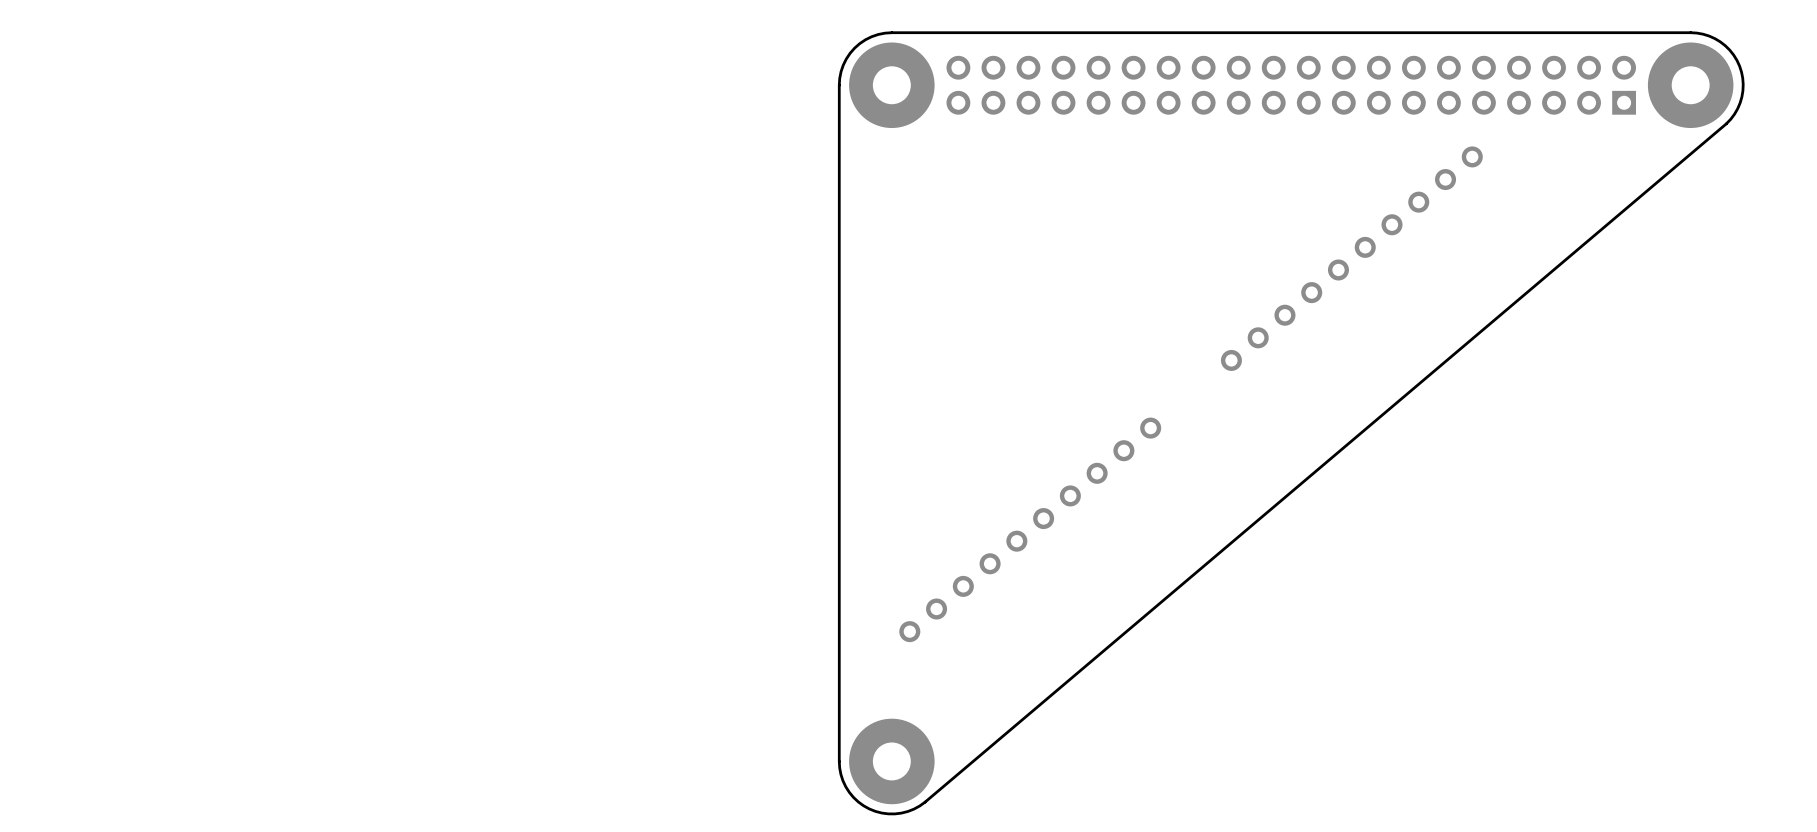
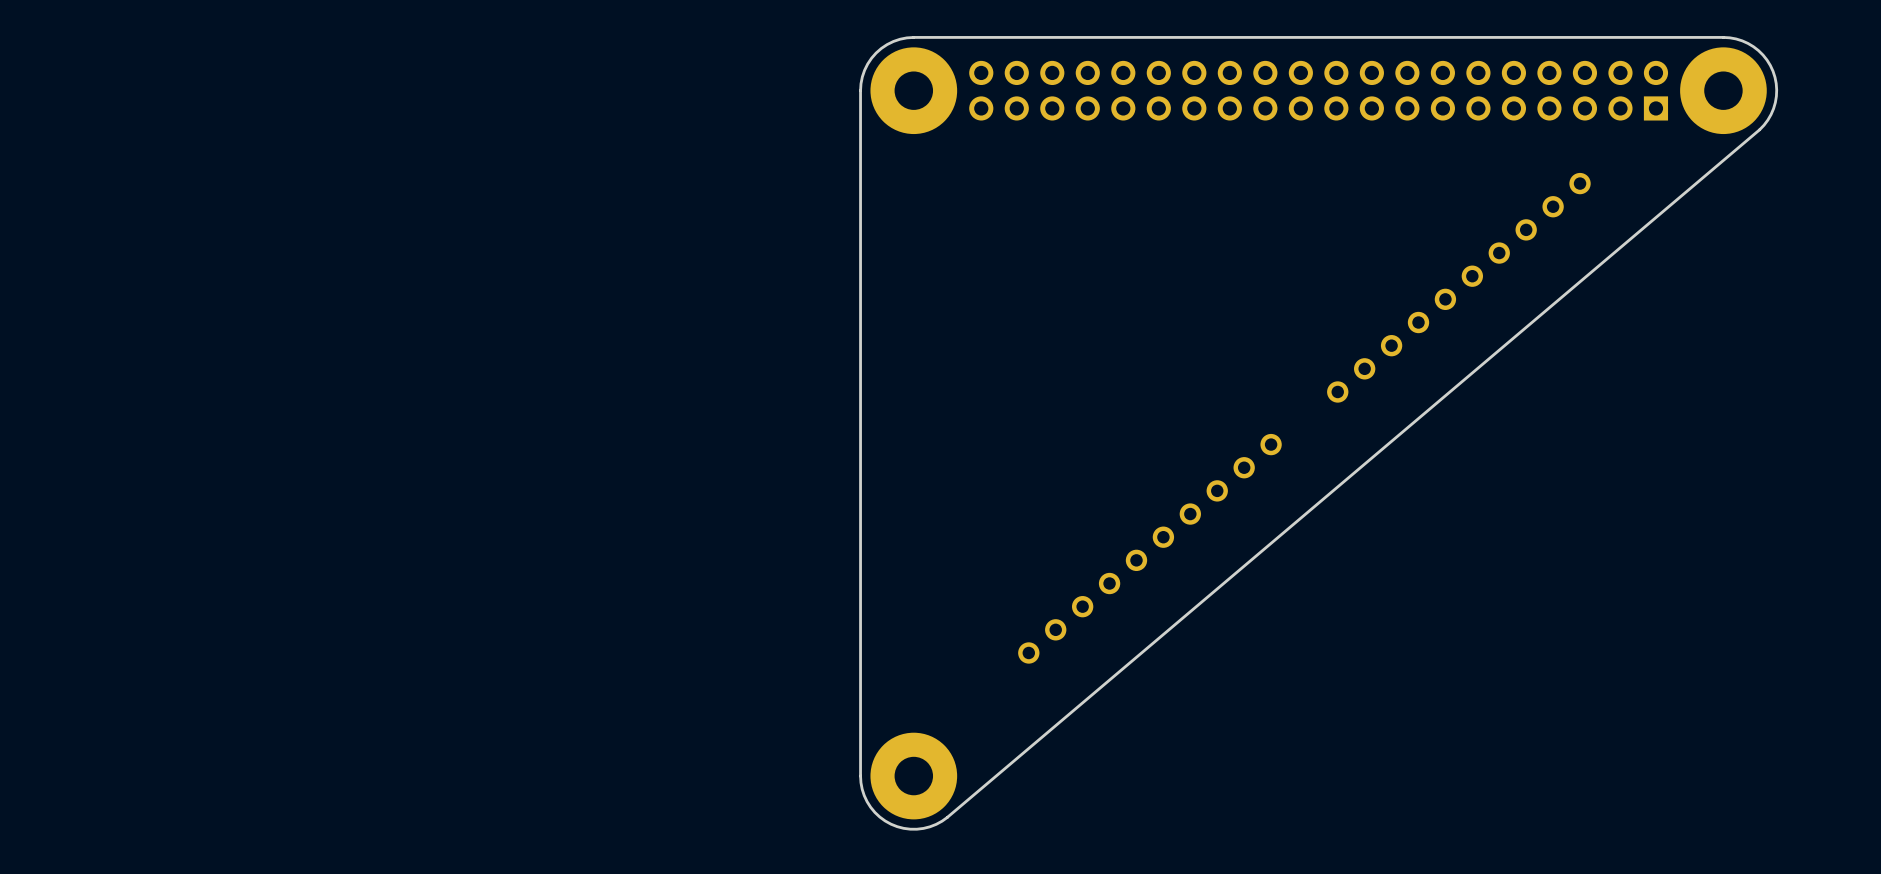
part: (1351, 258) -> none
part: none -> (1458, 287)
part: (1030, 529) -> none
part: none -> (1149, 548)

